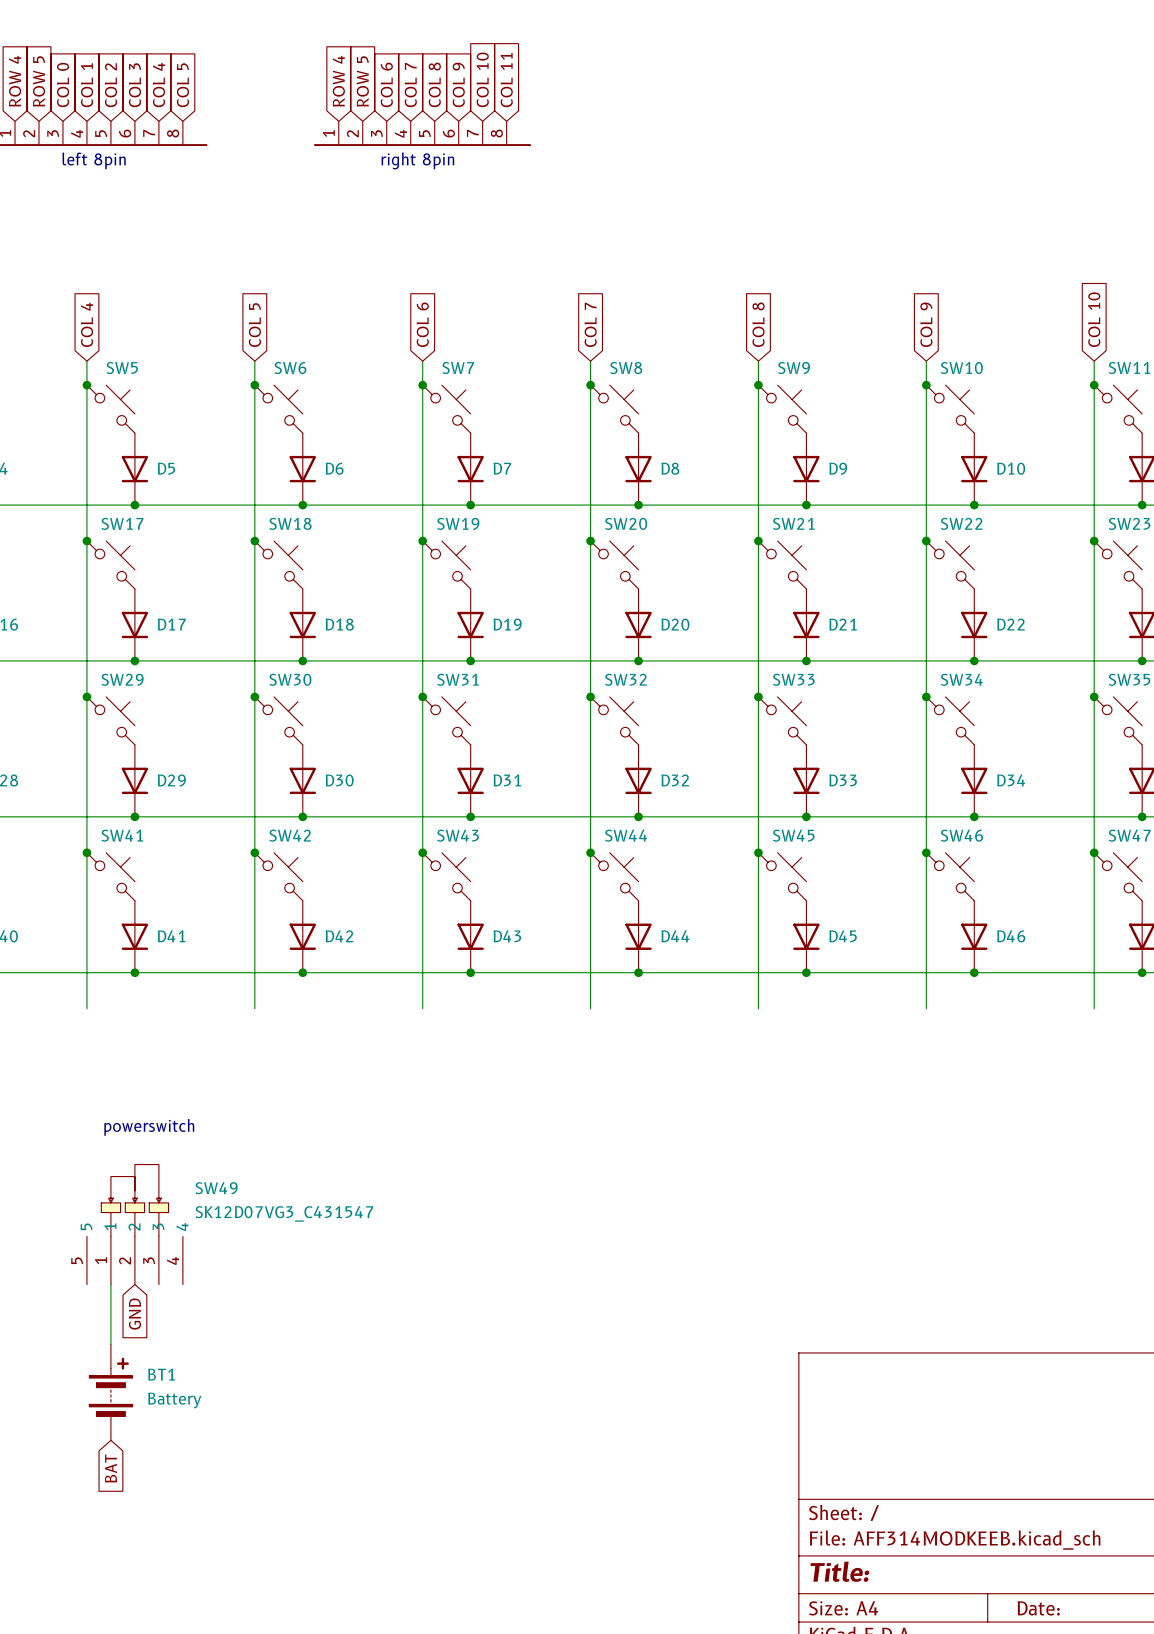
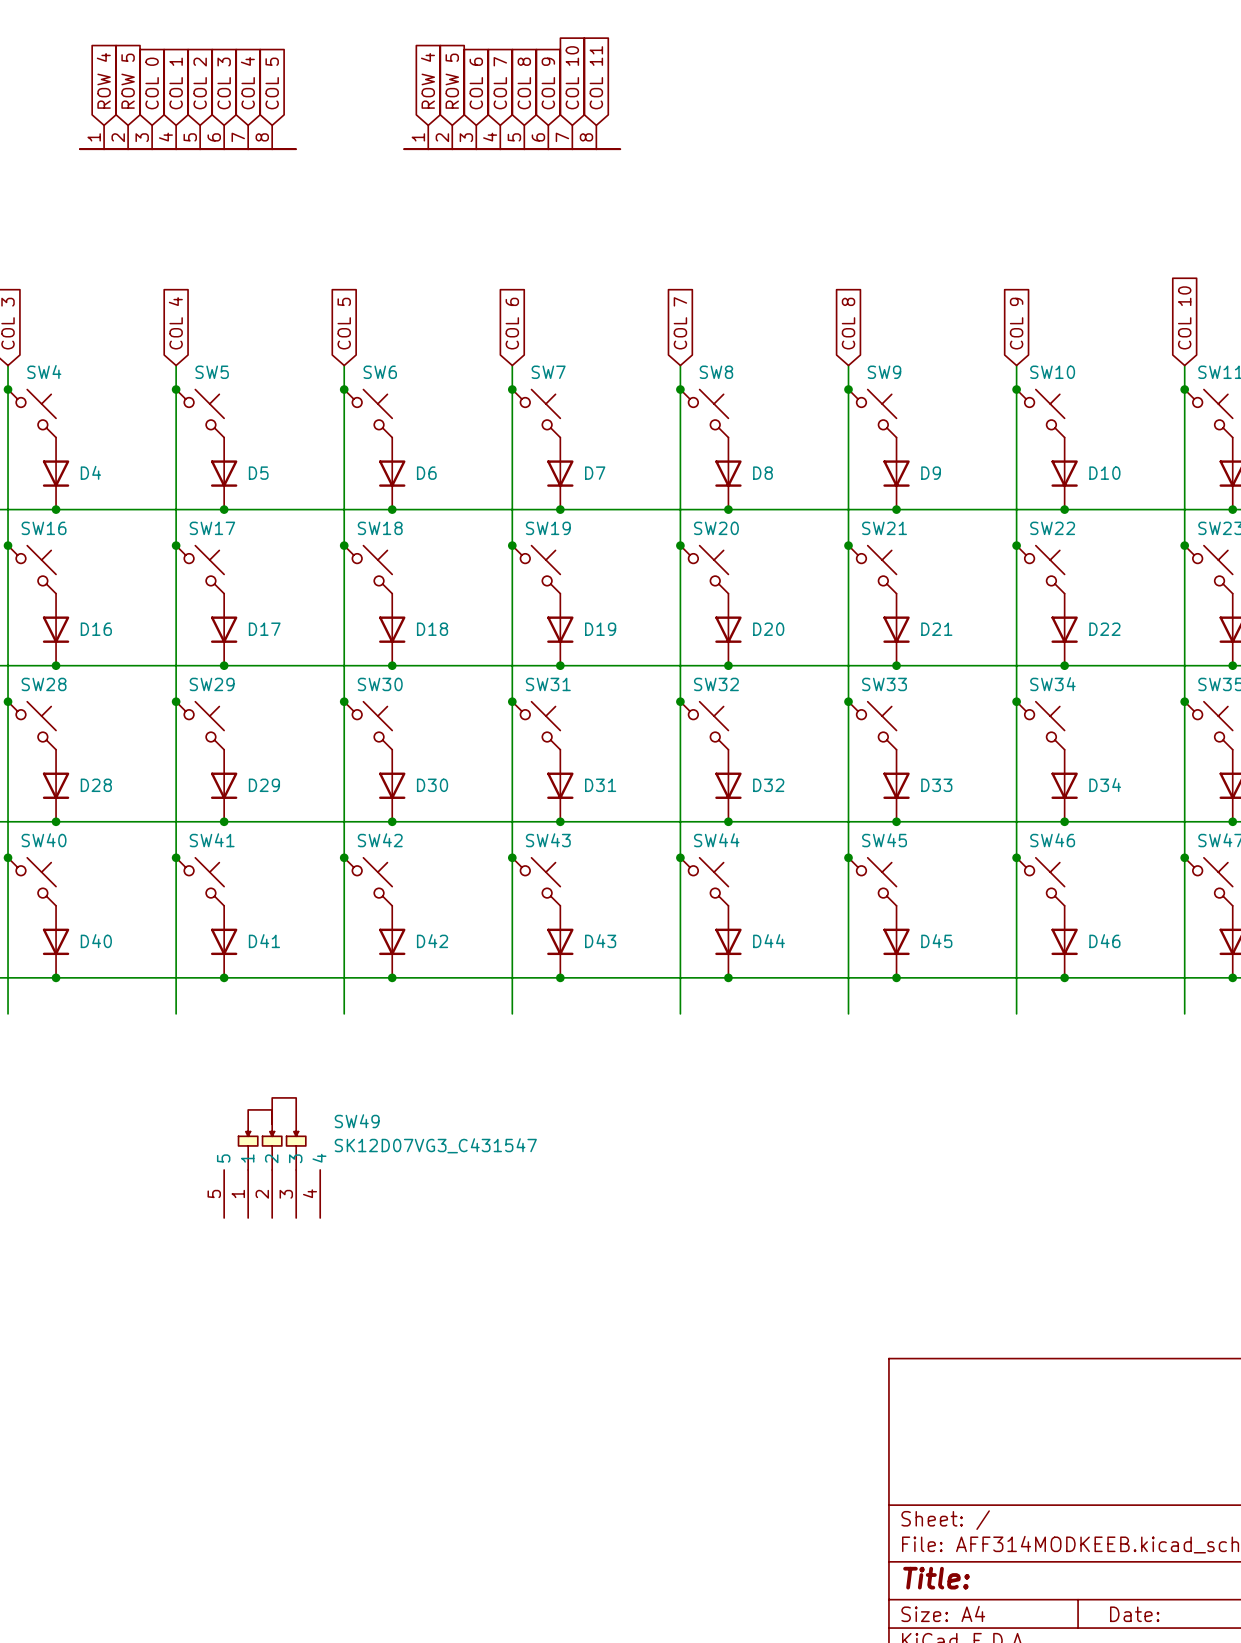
text: left 8pin (94, 160) -> none
text: right 8pin (417, 160) -> none
text: powerswitch (149, 1127) -> none
SW49 position: (134, 1224) -> (272, 1157)
wire: (110, 1284) (110, 1344) -> none
global label: GND (134, 1314) -> none
BT1: Battery (110, 1392) -> none
global label: BAT (110, 1468) -> none

